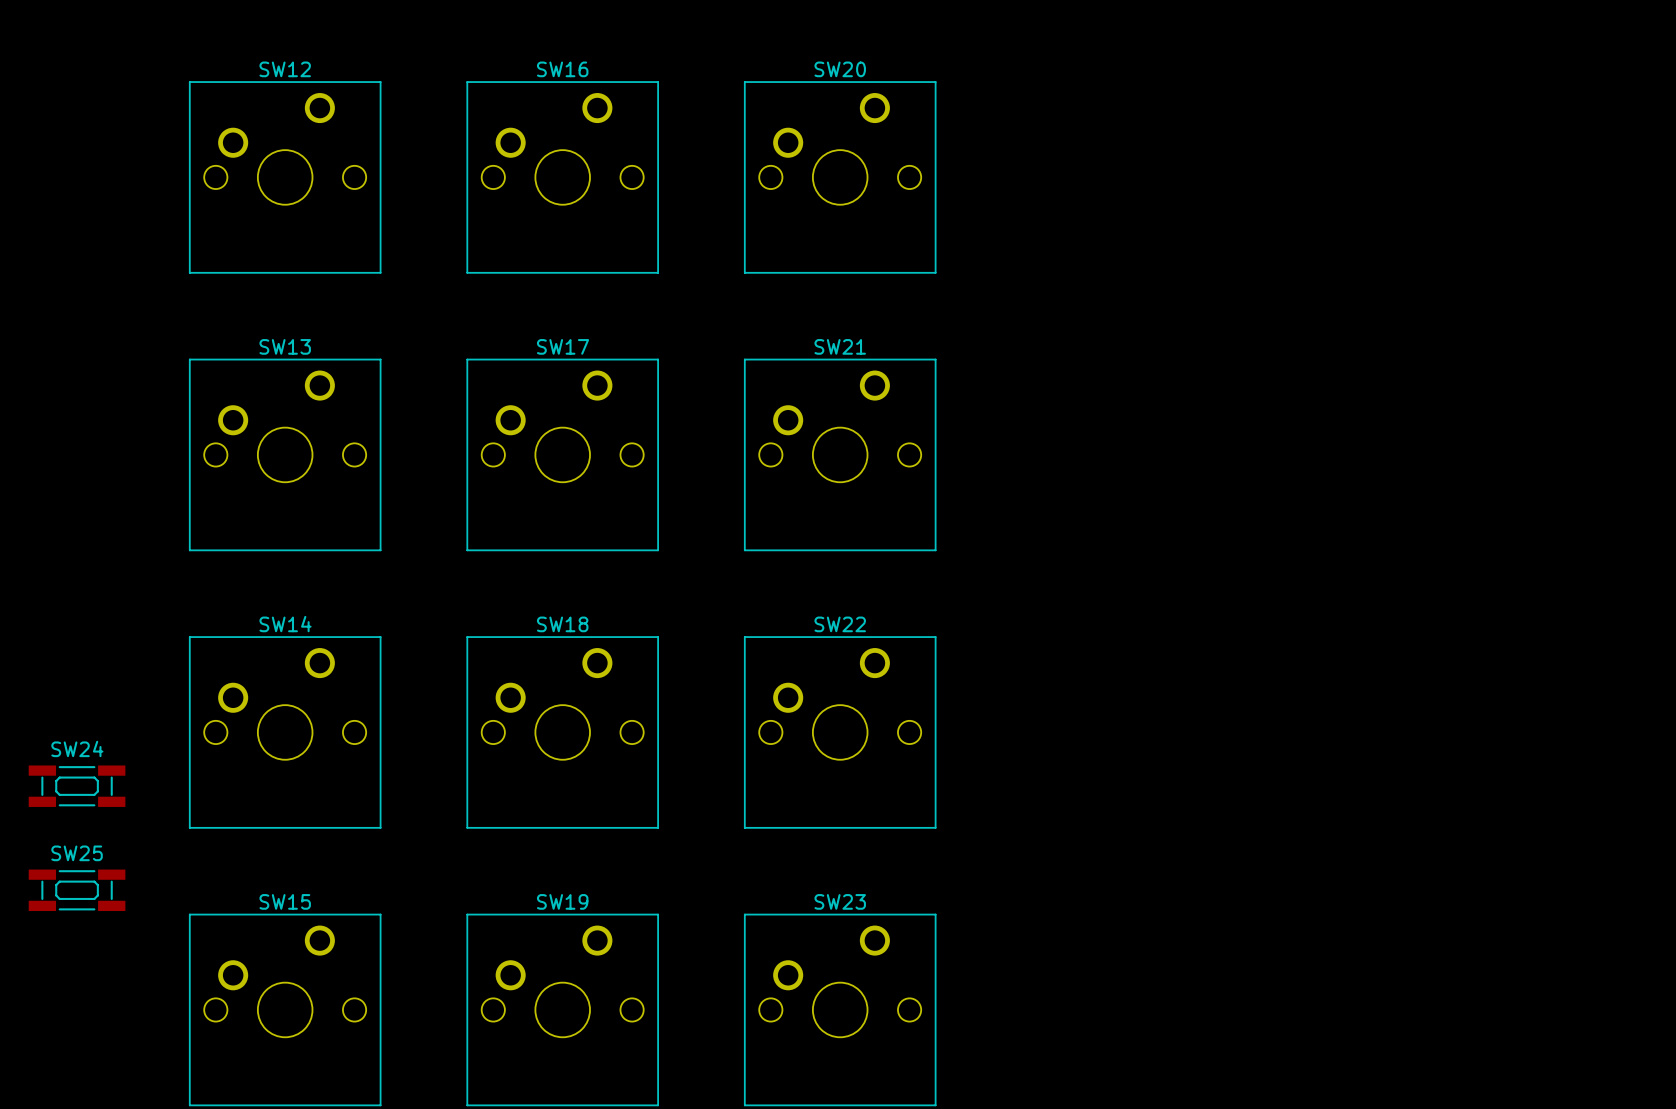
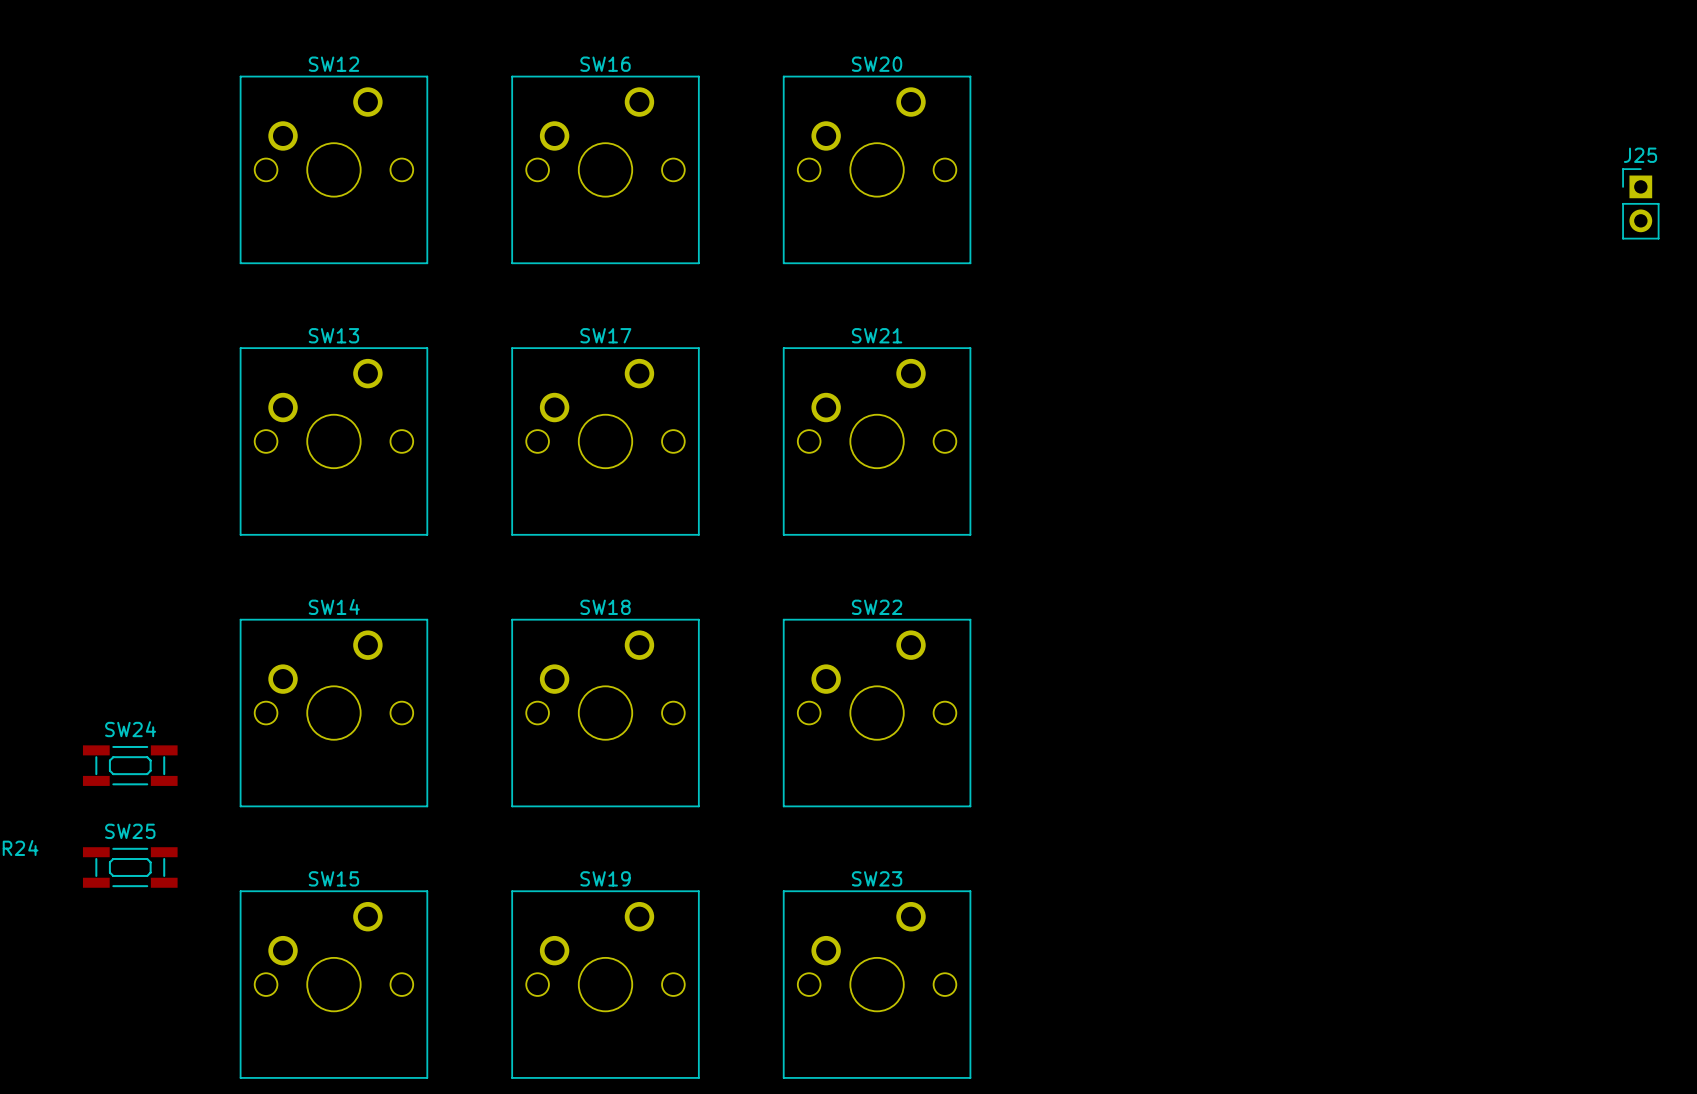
J25: none -> (1640, 203)

